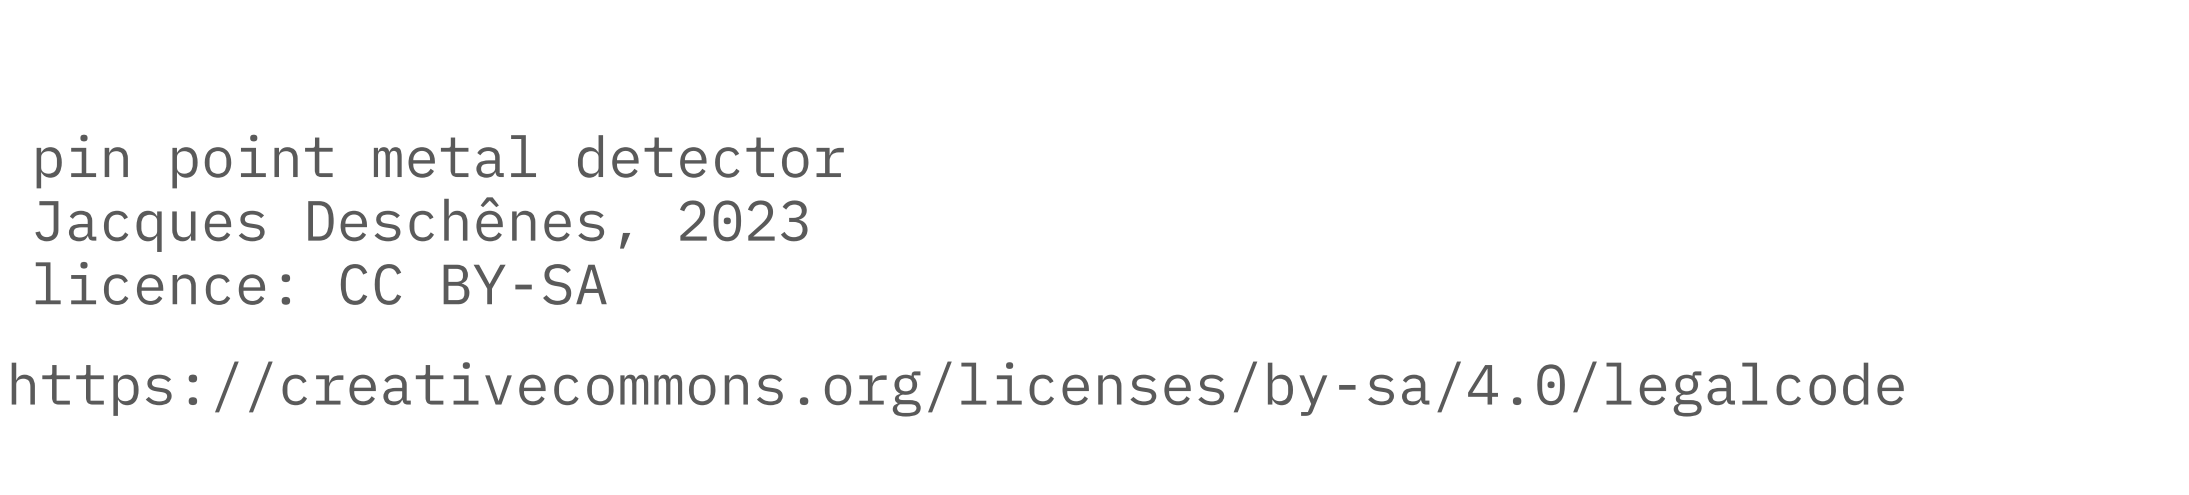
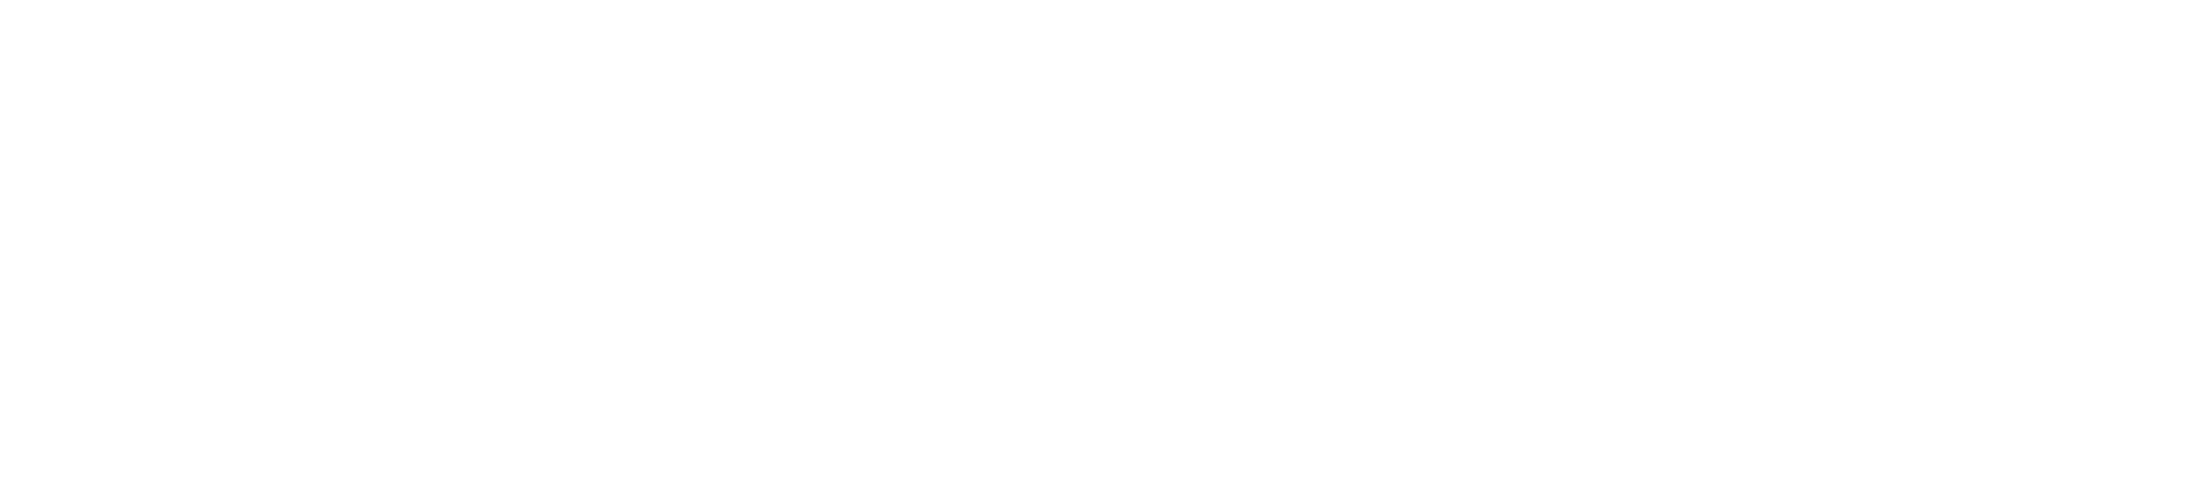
text: pin point metal detector (440, 161) -> none
text: Jacques Deschênes, 2023 (421, 224) -> none
text: licence: CC BY-SA (321, 283) -> none
text: https://creativecommons.org/licenses/by-sa/4.0/legalcode (957, 389) -> none

